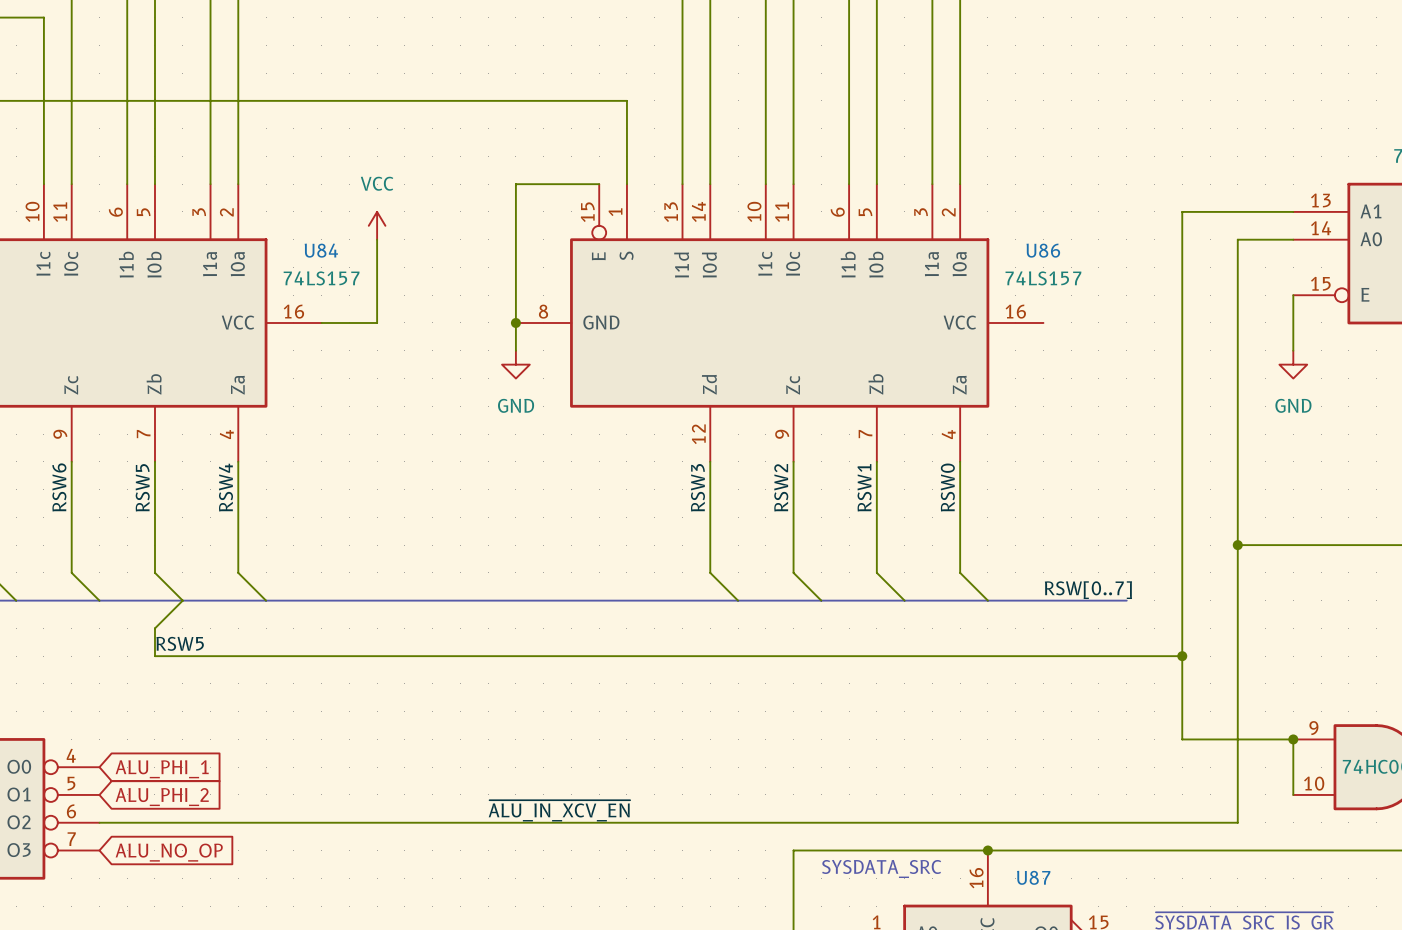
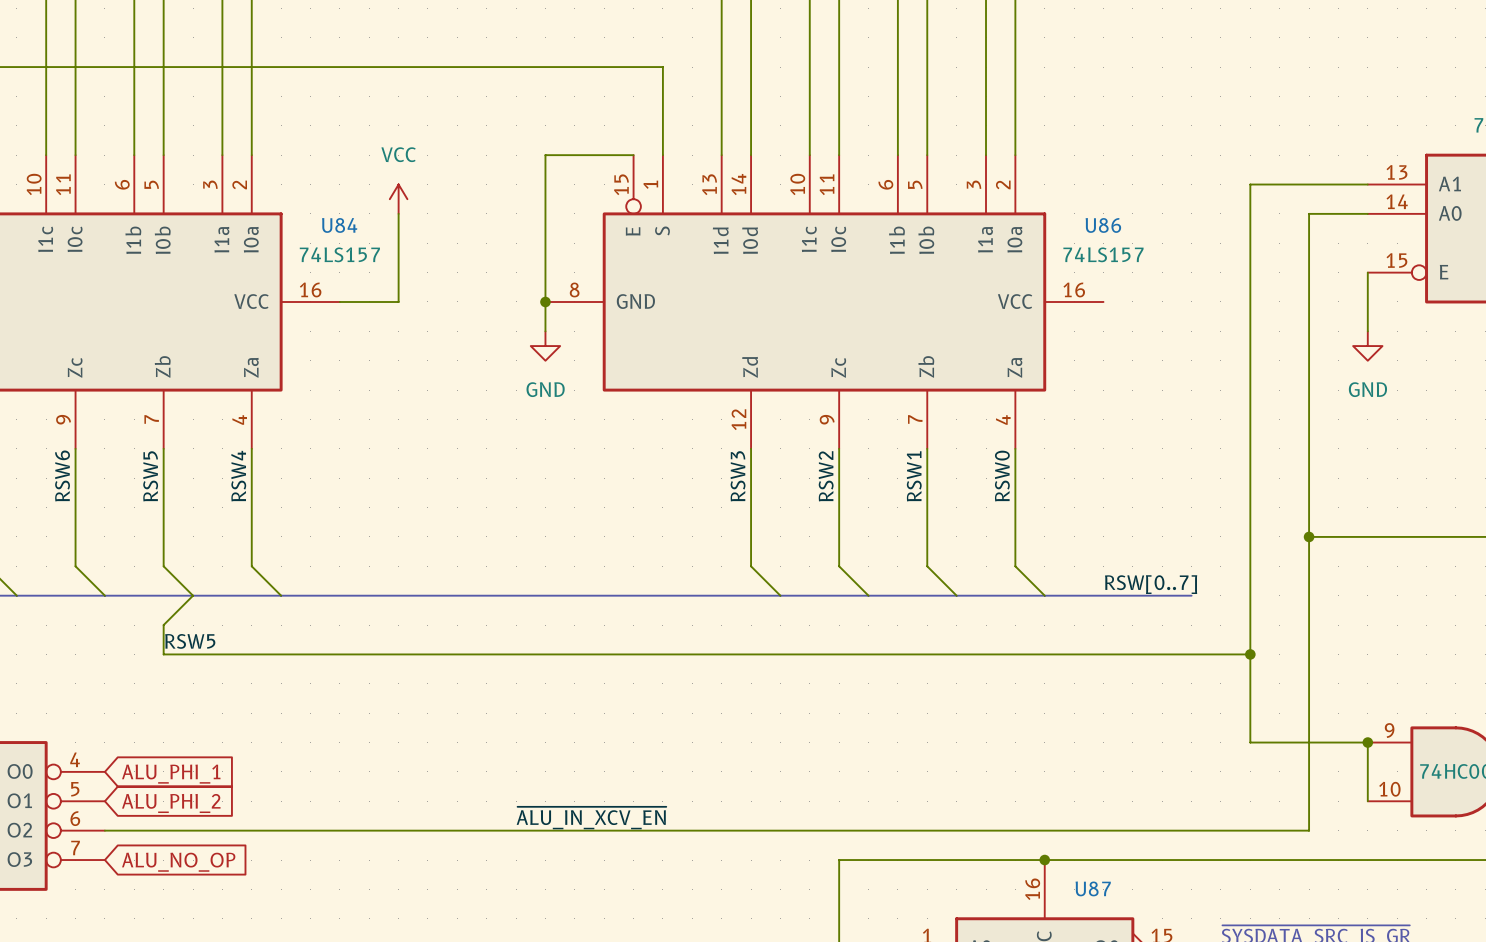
text: SYSDATA_SRC (881, 868) -> none

